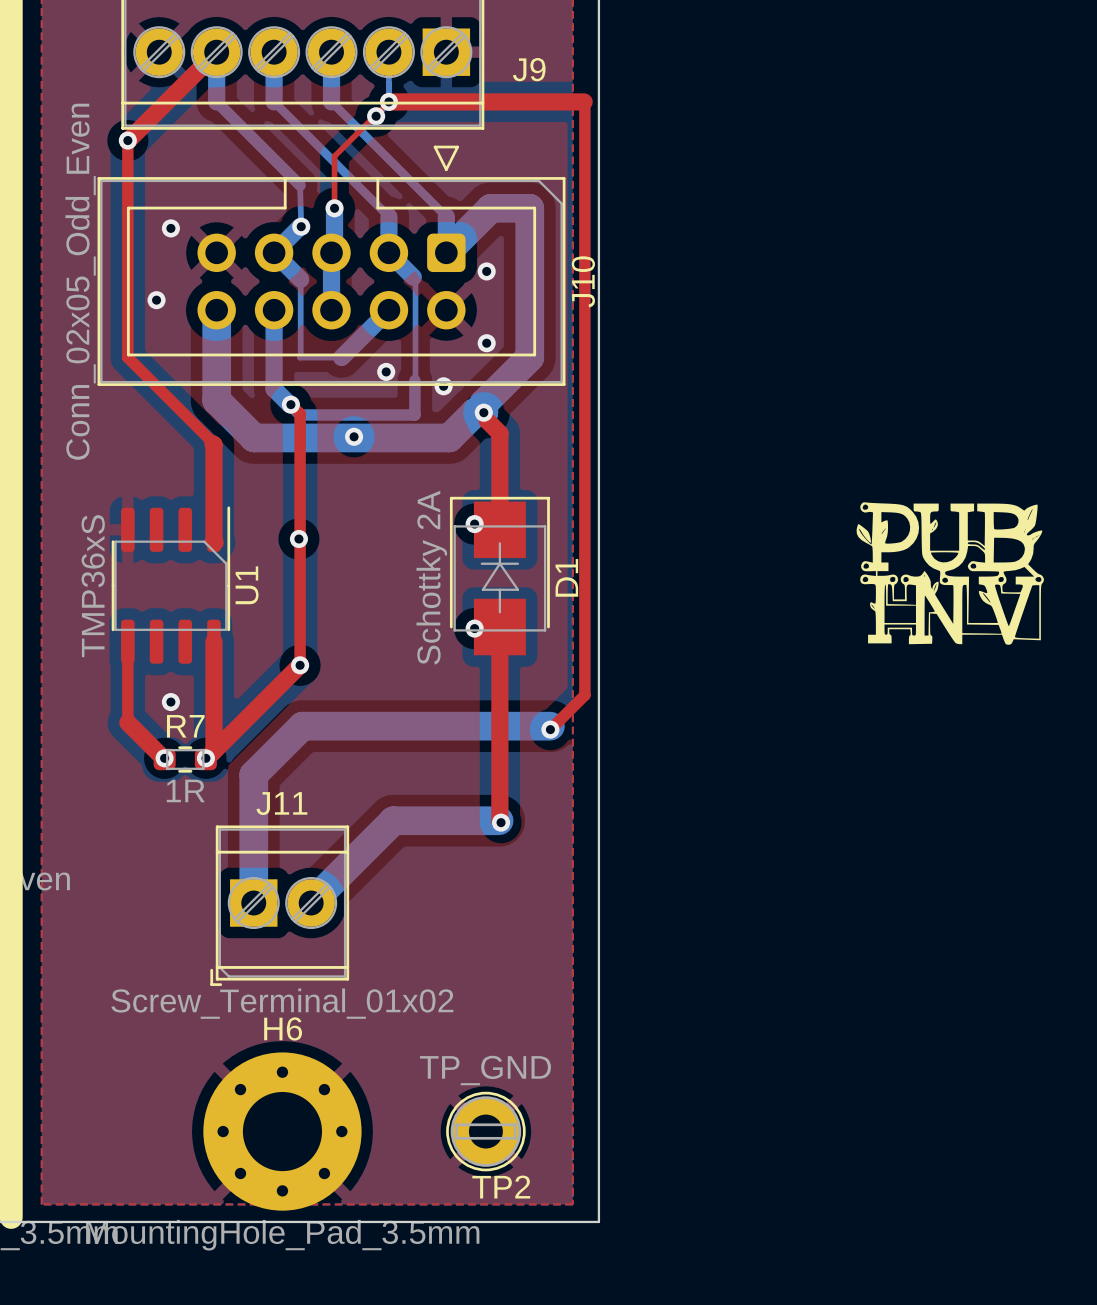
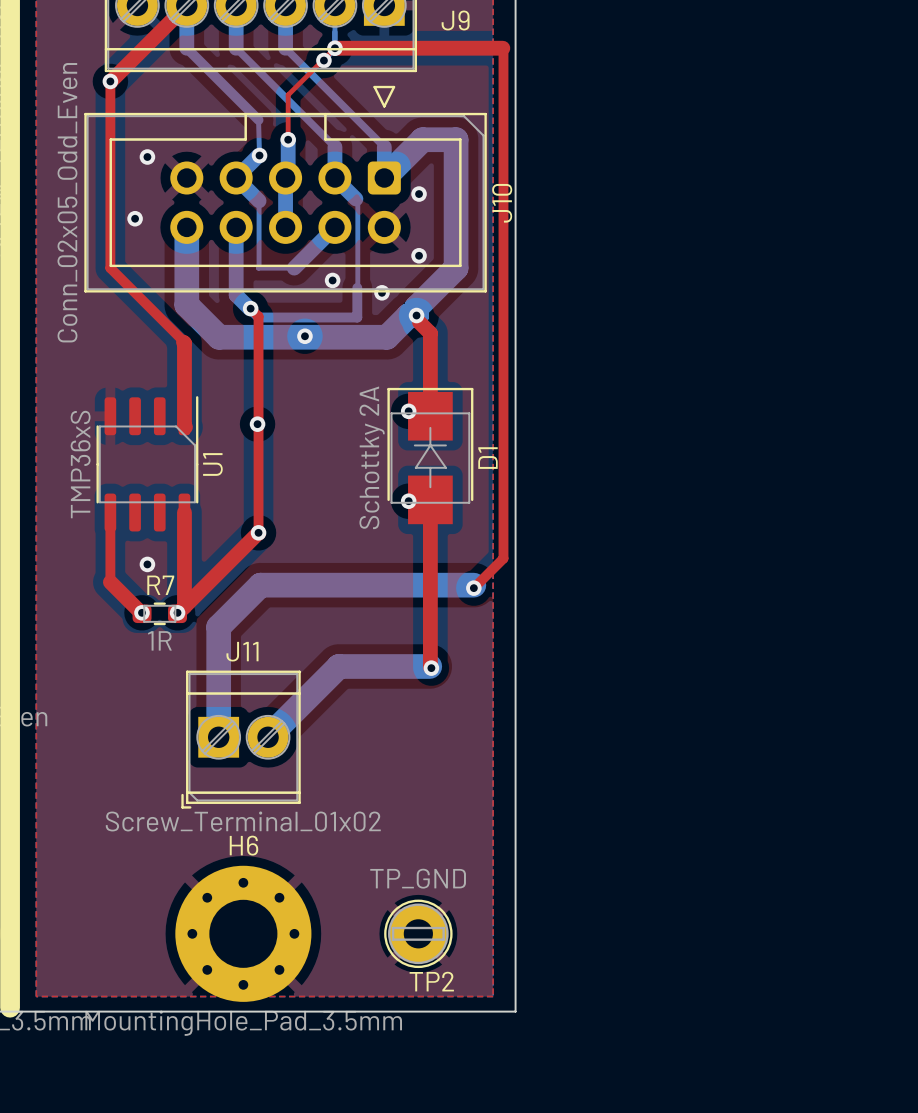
drawing: [856, 502, 1044, 645] -> none

